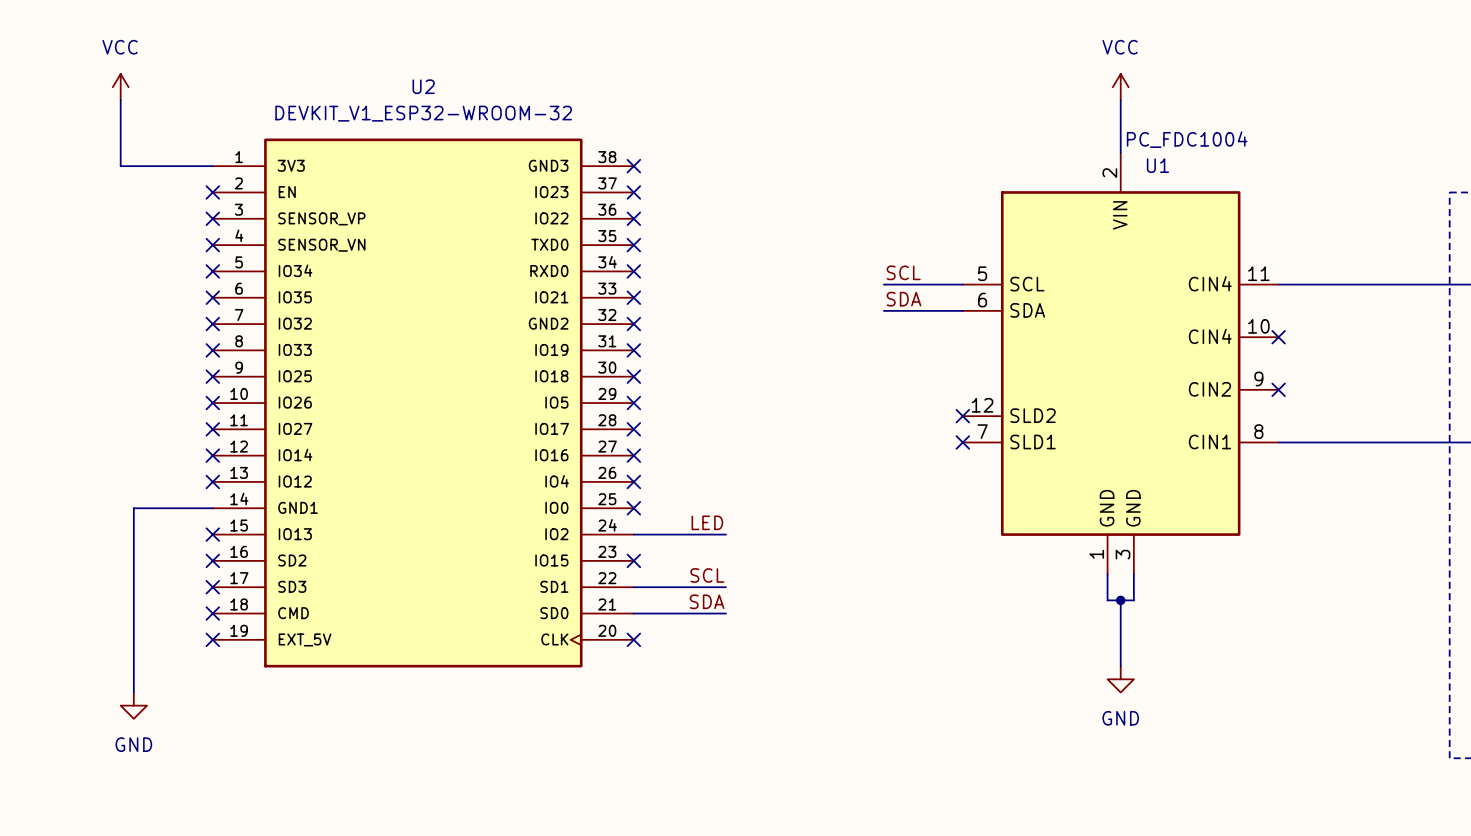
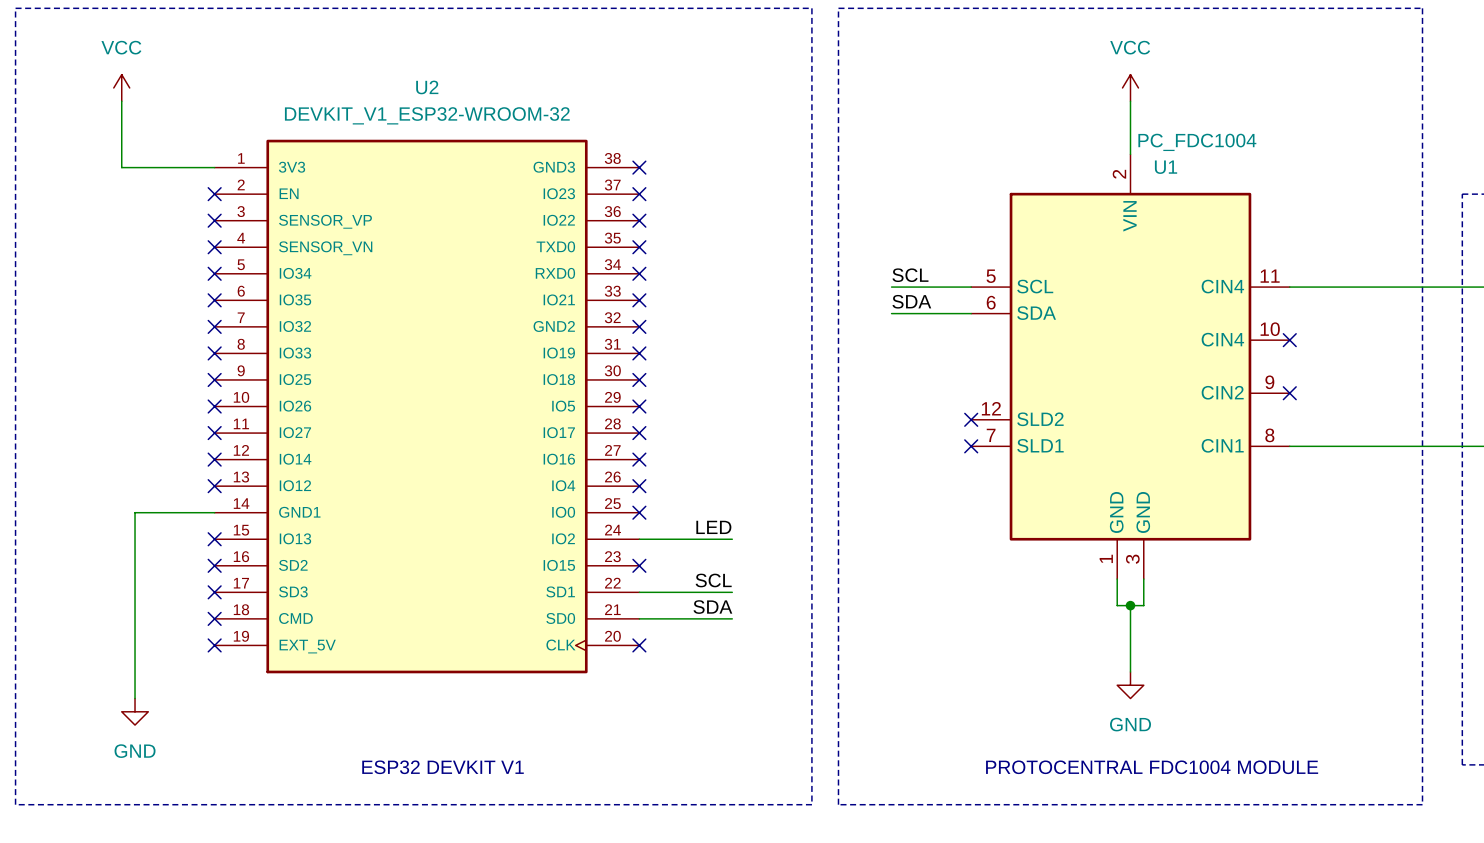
line: none -> (15, 8) (811, 8) (811, 804) (15, 804) (15, 8)
line: none -> (838, 8) (1422, 8) (1422, 804) (838, 804) (838, 8)
text: none -> ESP32 DEVKIT V1 (443, 767)
text: none -> PROTOCENTRAL FDC1004 MODULE (1152, 767)

